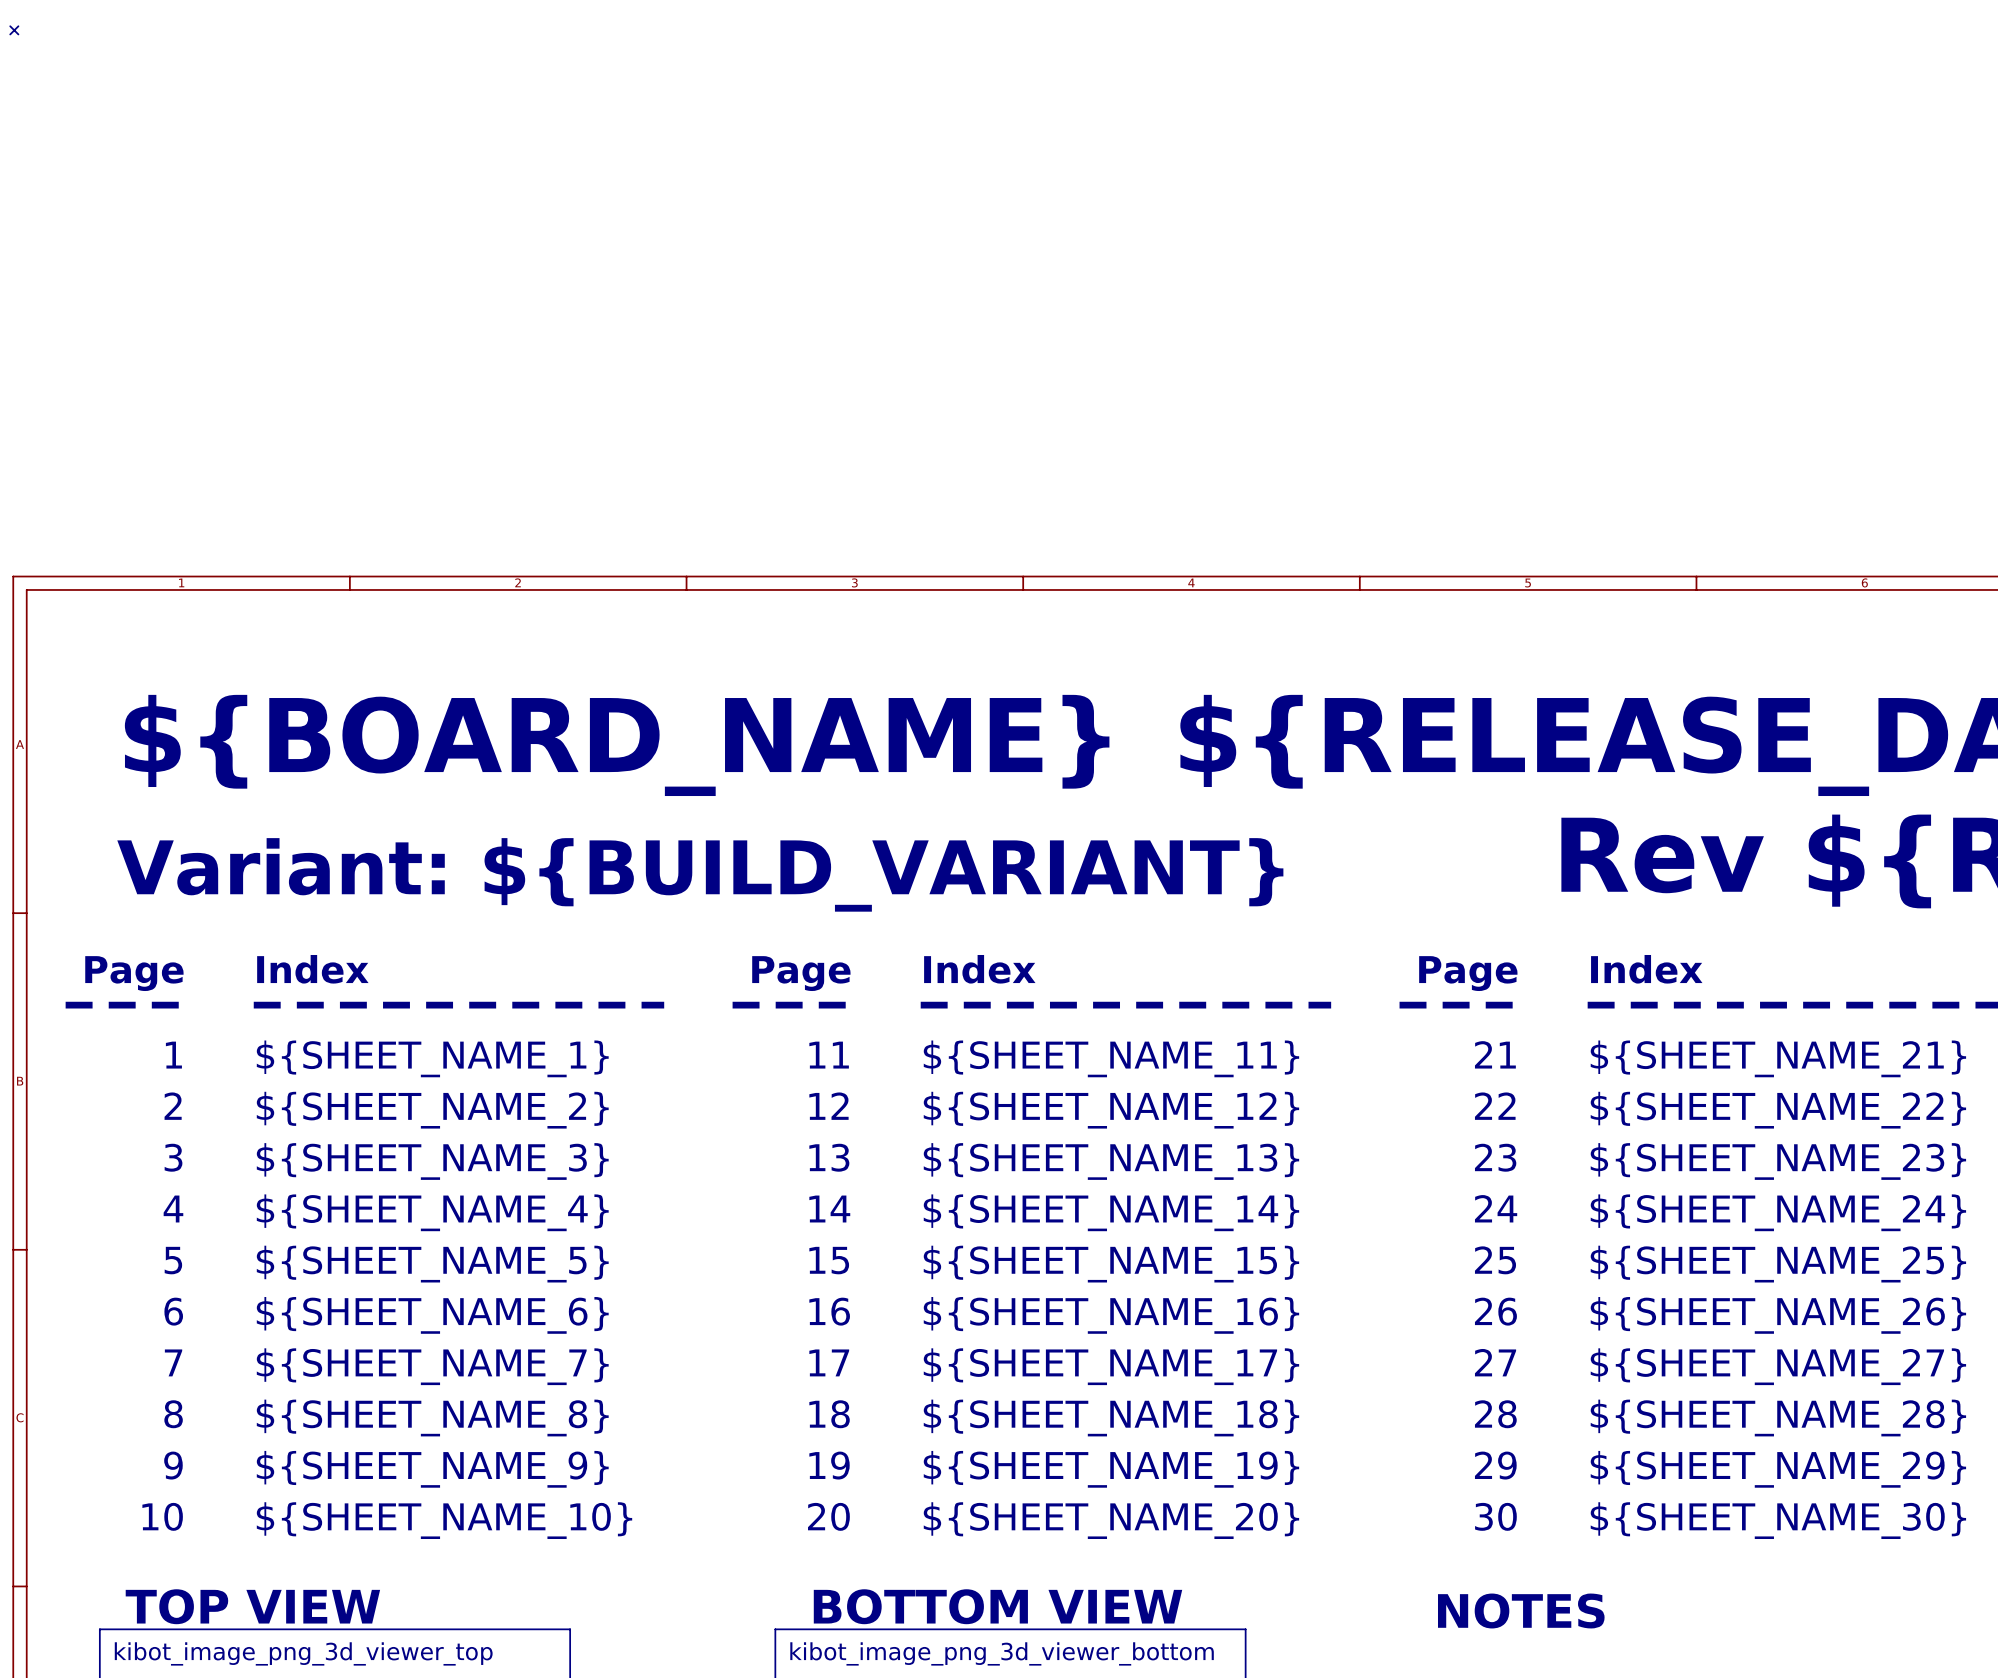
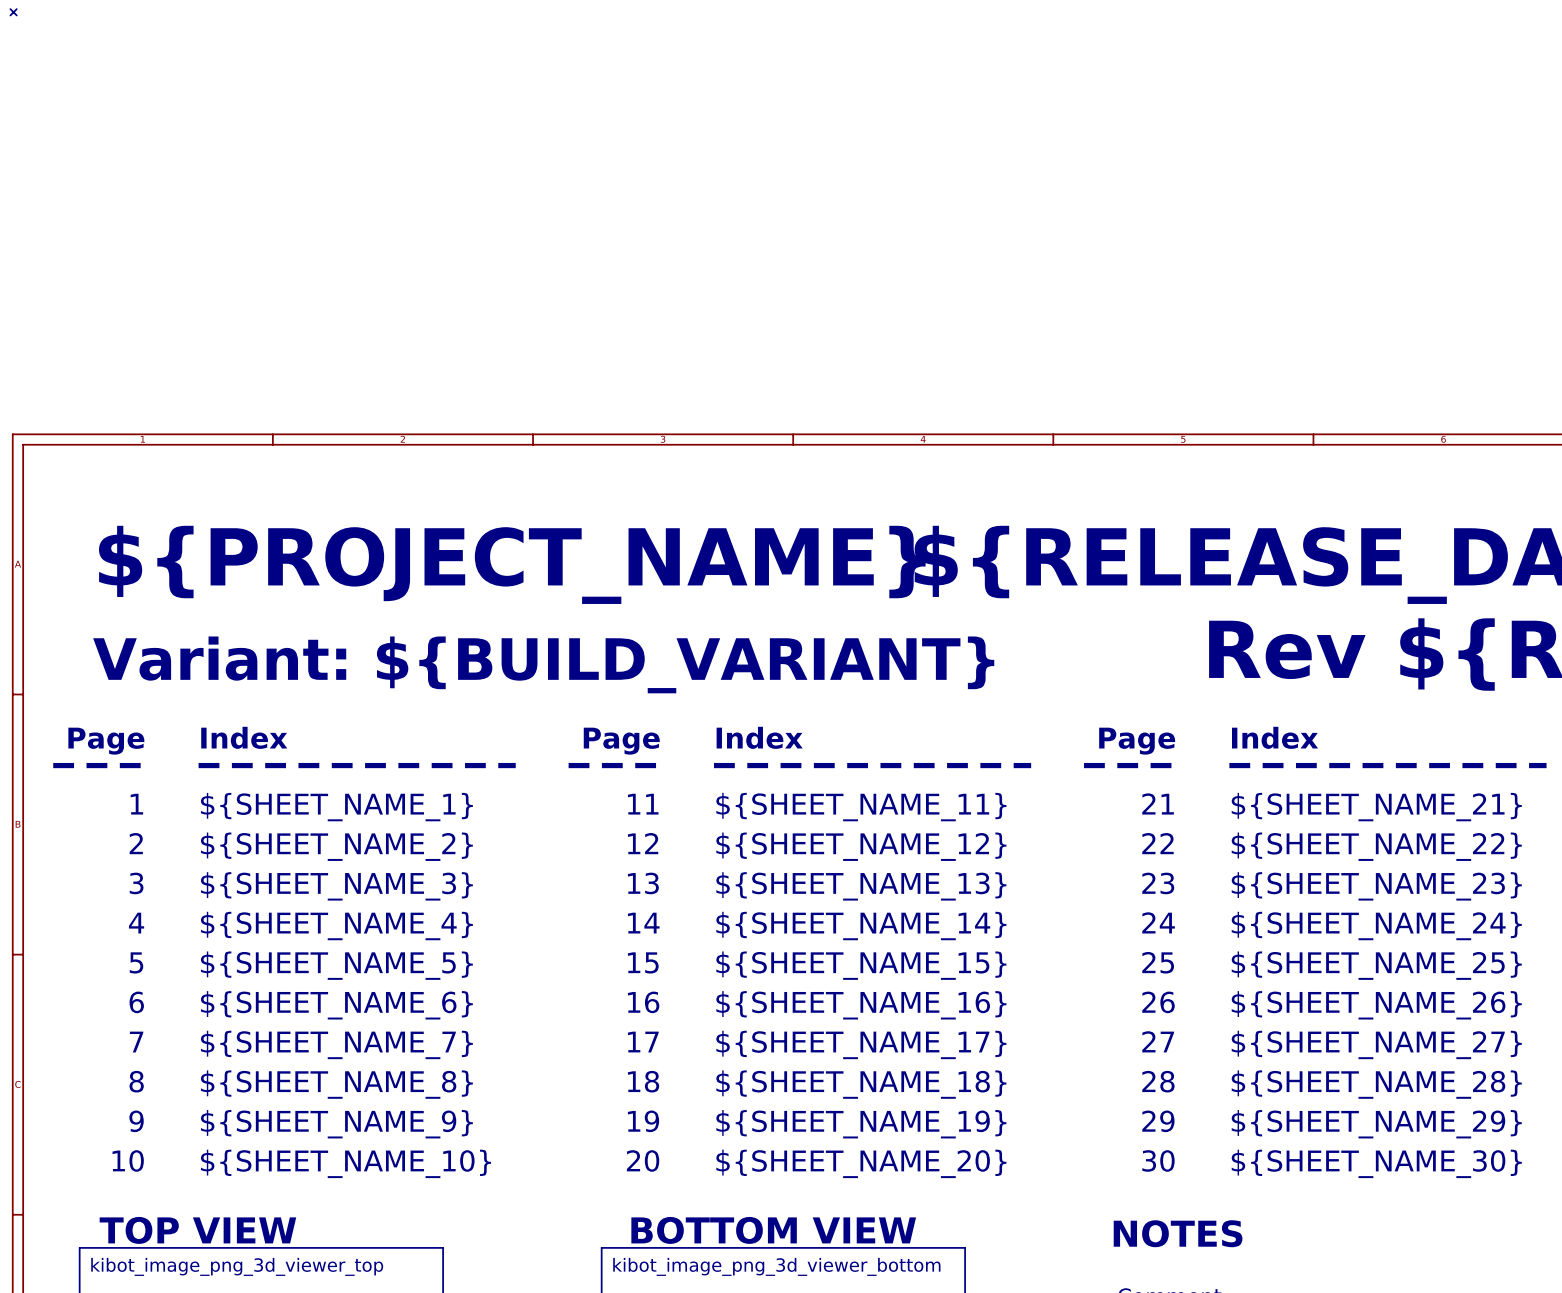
text: ${BOARD_NAME} (617, 745) -> ${PROJECT_NAME} (512, 564)

